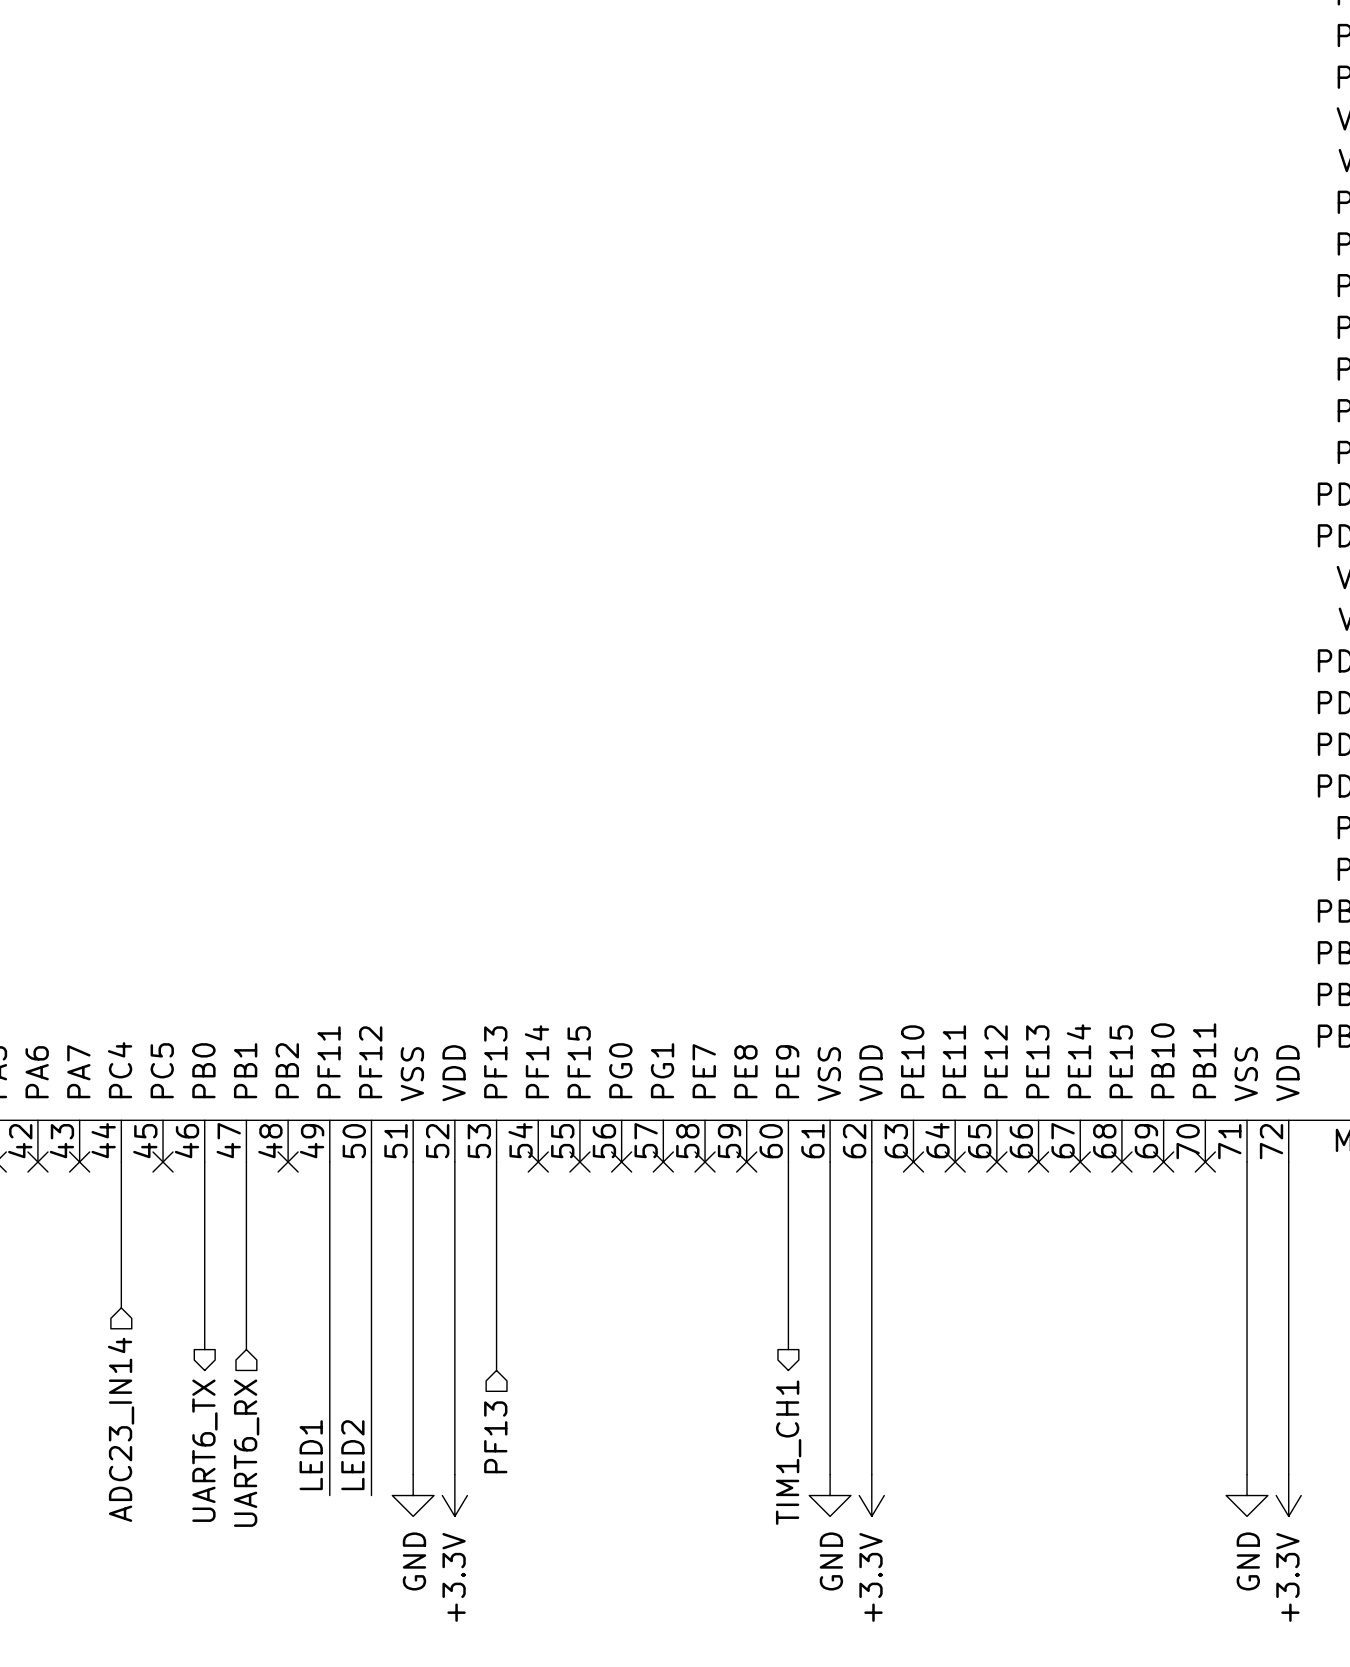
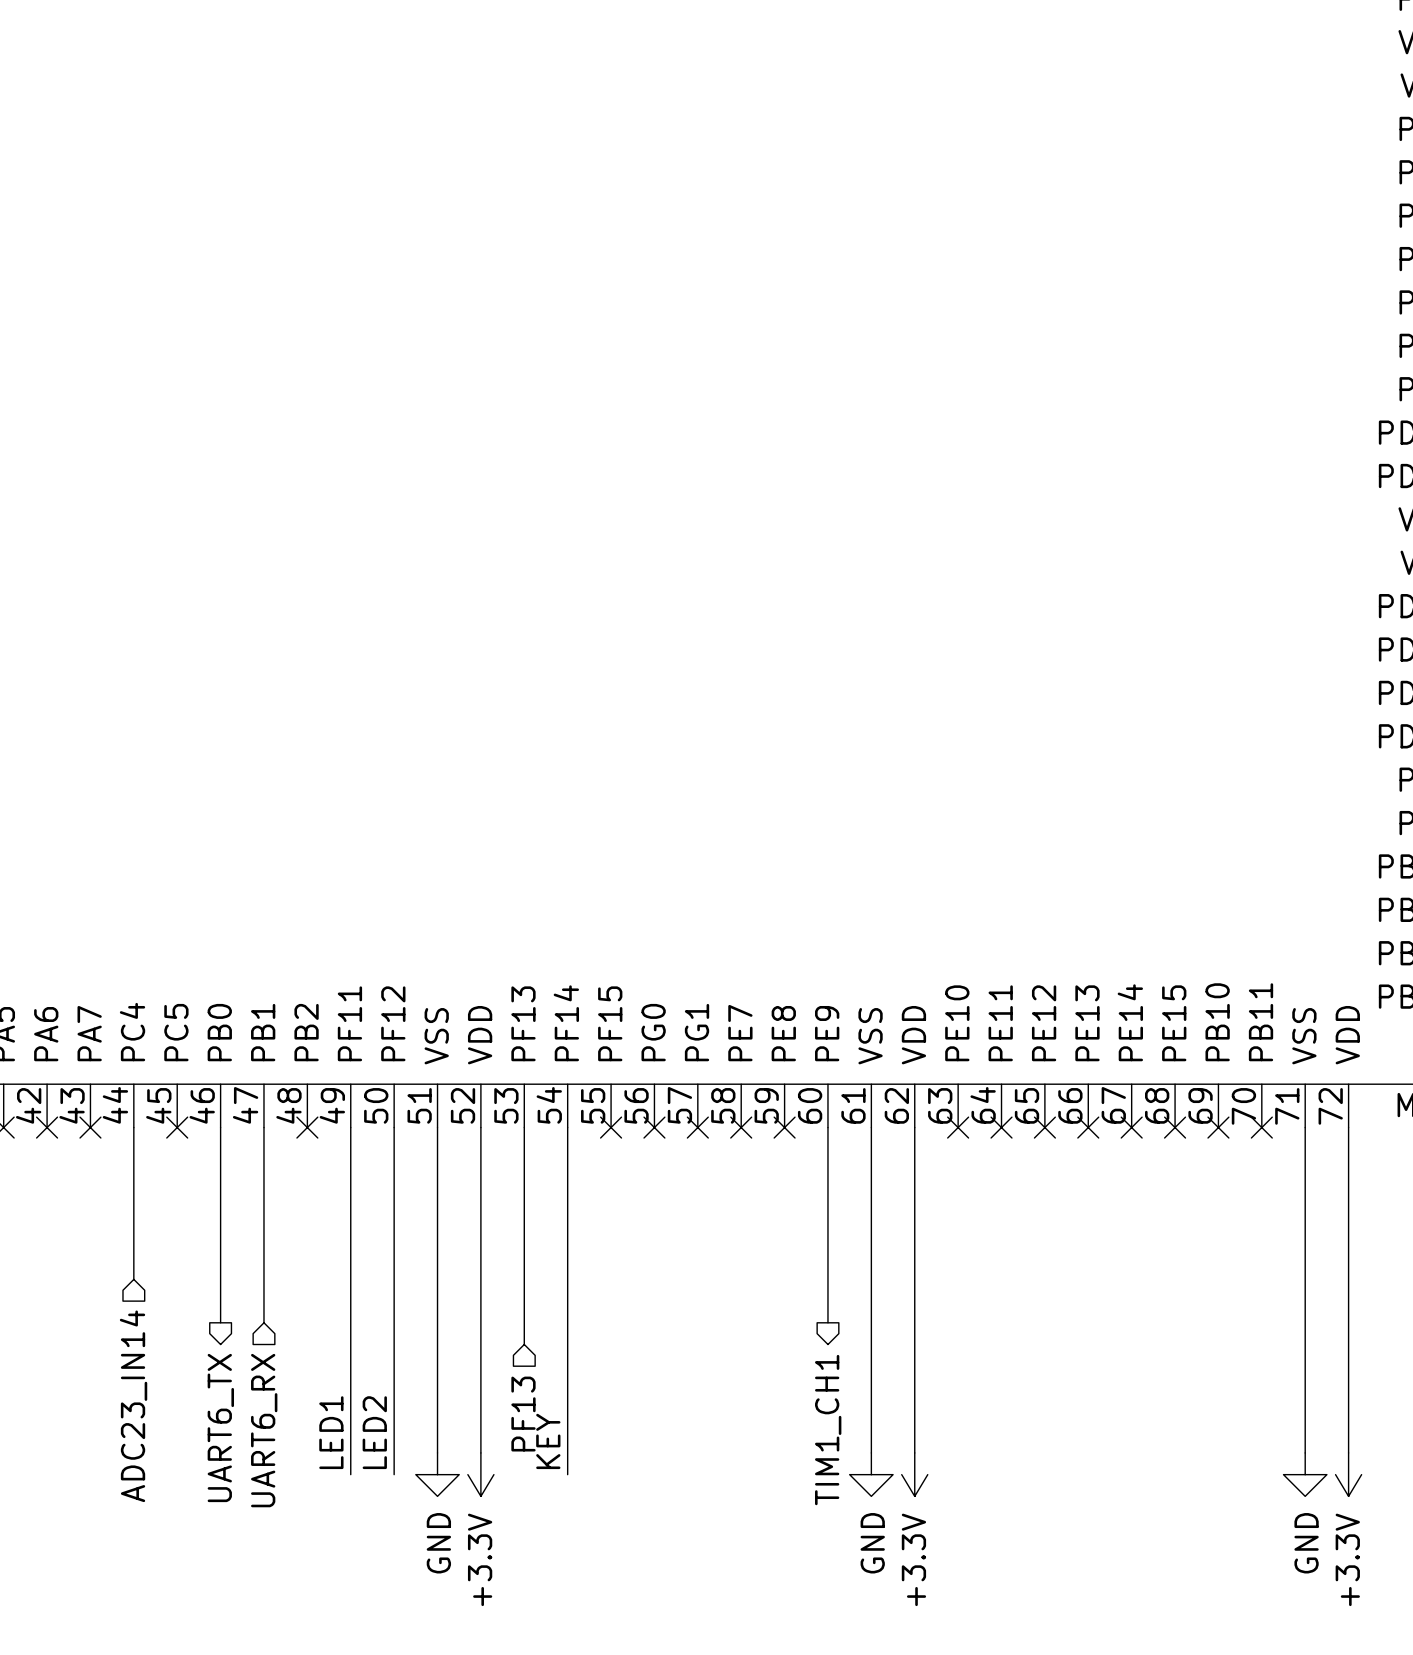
wire: none -> (567, 1127) (567, 1474)
no-connect mark: (538, 1161) -> none
label: none -> KEY (548, 1441)

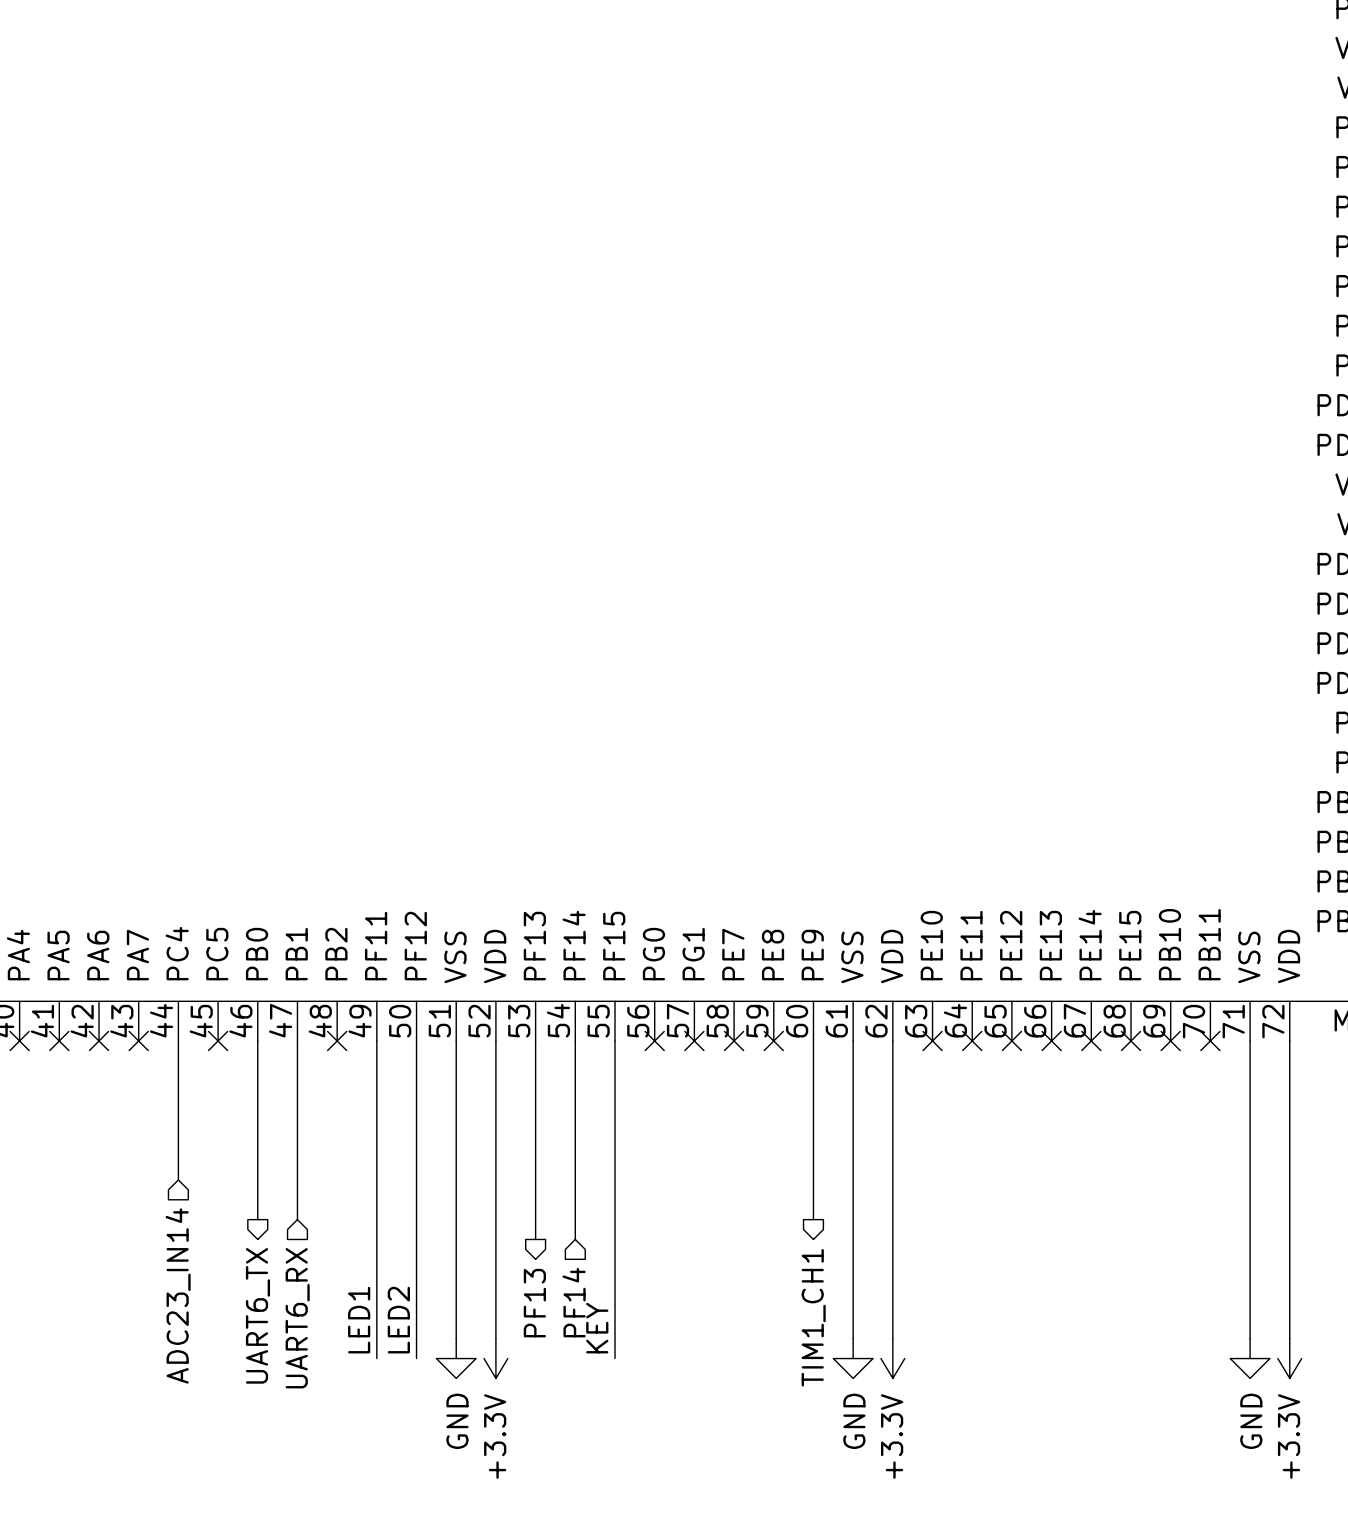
wire: none -> (615, 1041) (615, 1358)
no-connect mark: (611, 1127) -> none
wire: (567, 1344) (567, 1474) -> none
hierarchical label: none -> PF14 (574, 1302)
hierarchical label shape: input (523, 1414) -> output (534, 1303)
label position: KEY (548, 1441) -> KEY (597, 1328)

